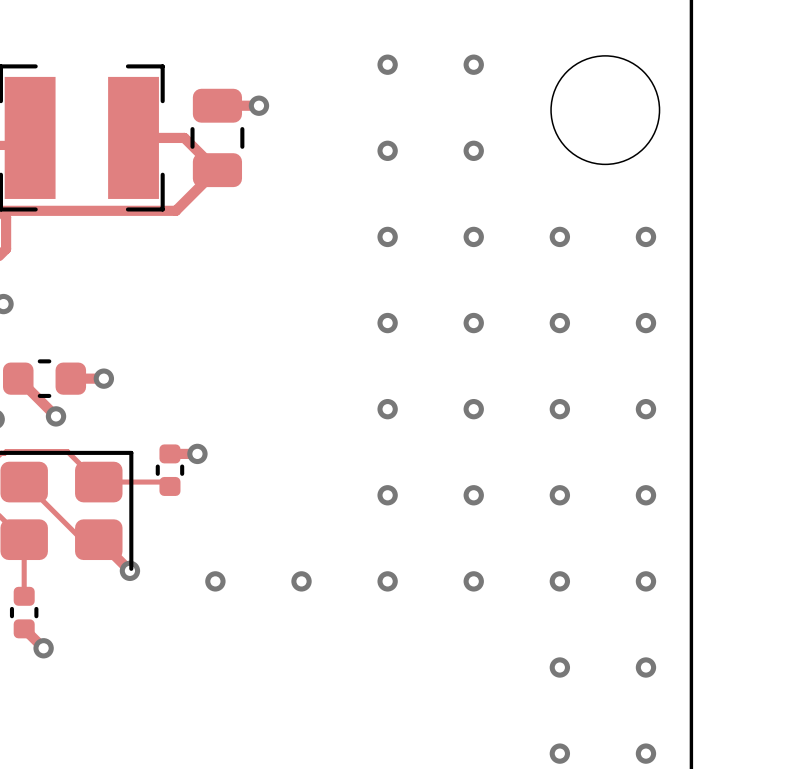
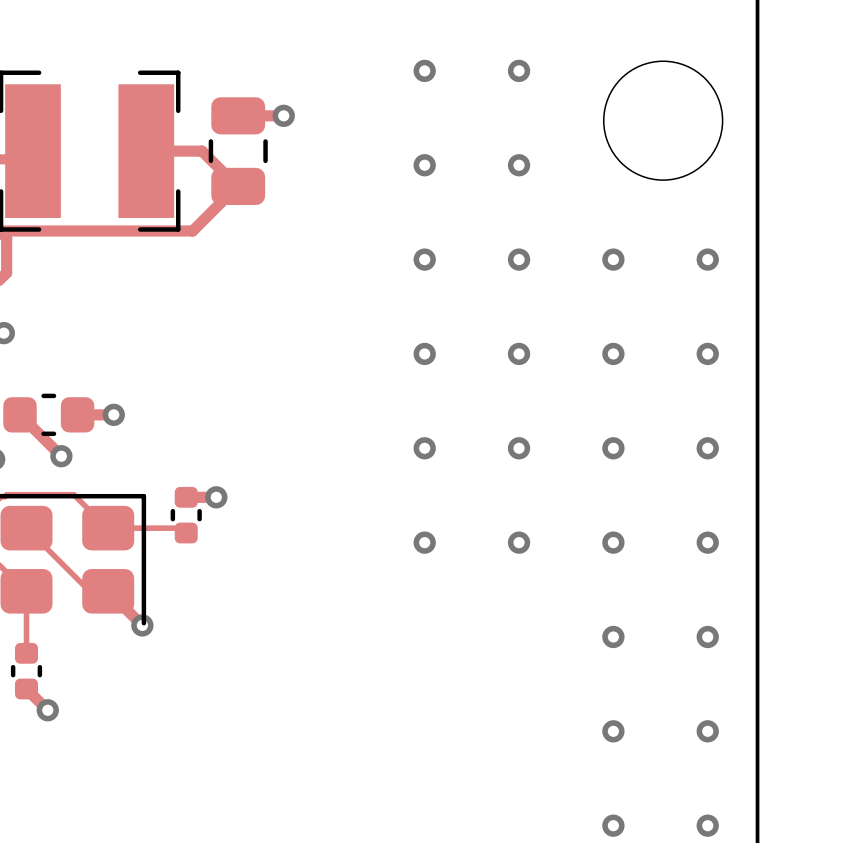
via: (215, 581) -> none
via: (301, 581) -> none
via: (387, 581) -> none
via: (473, 581) -> none

